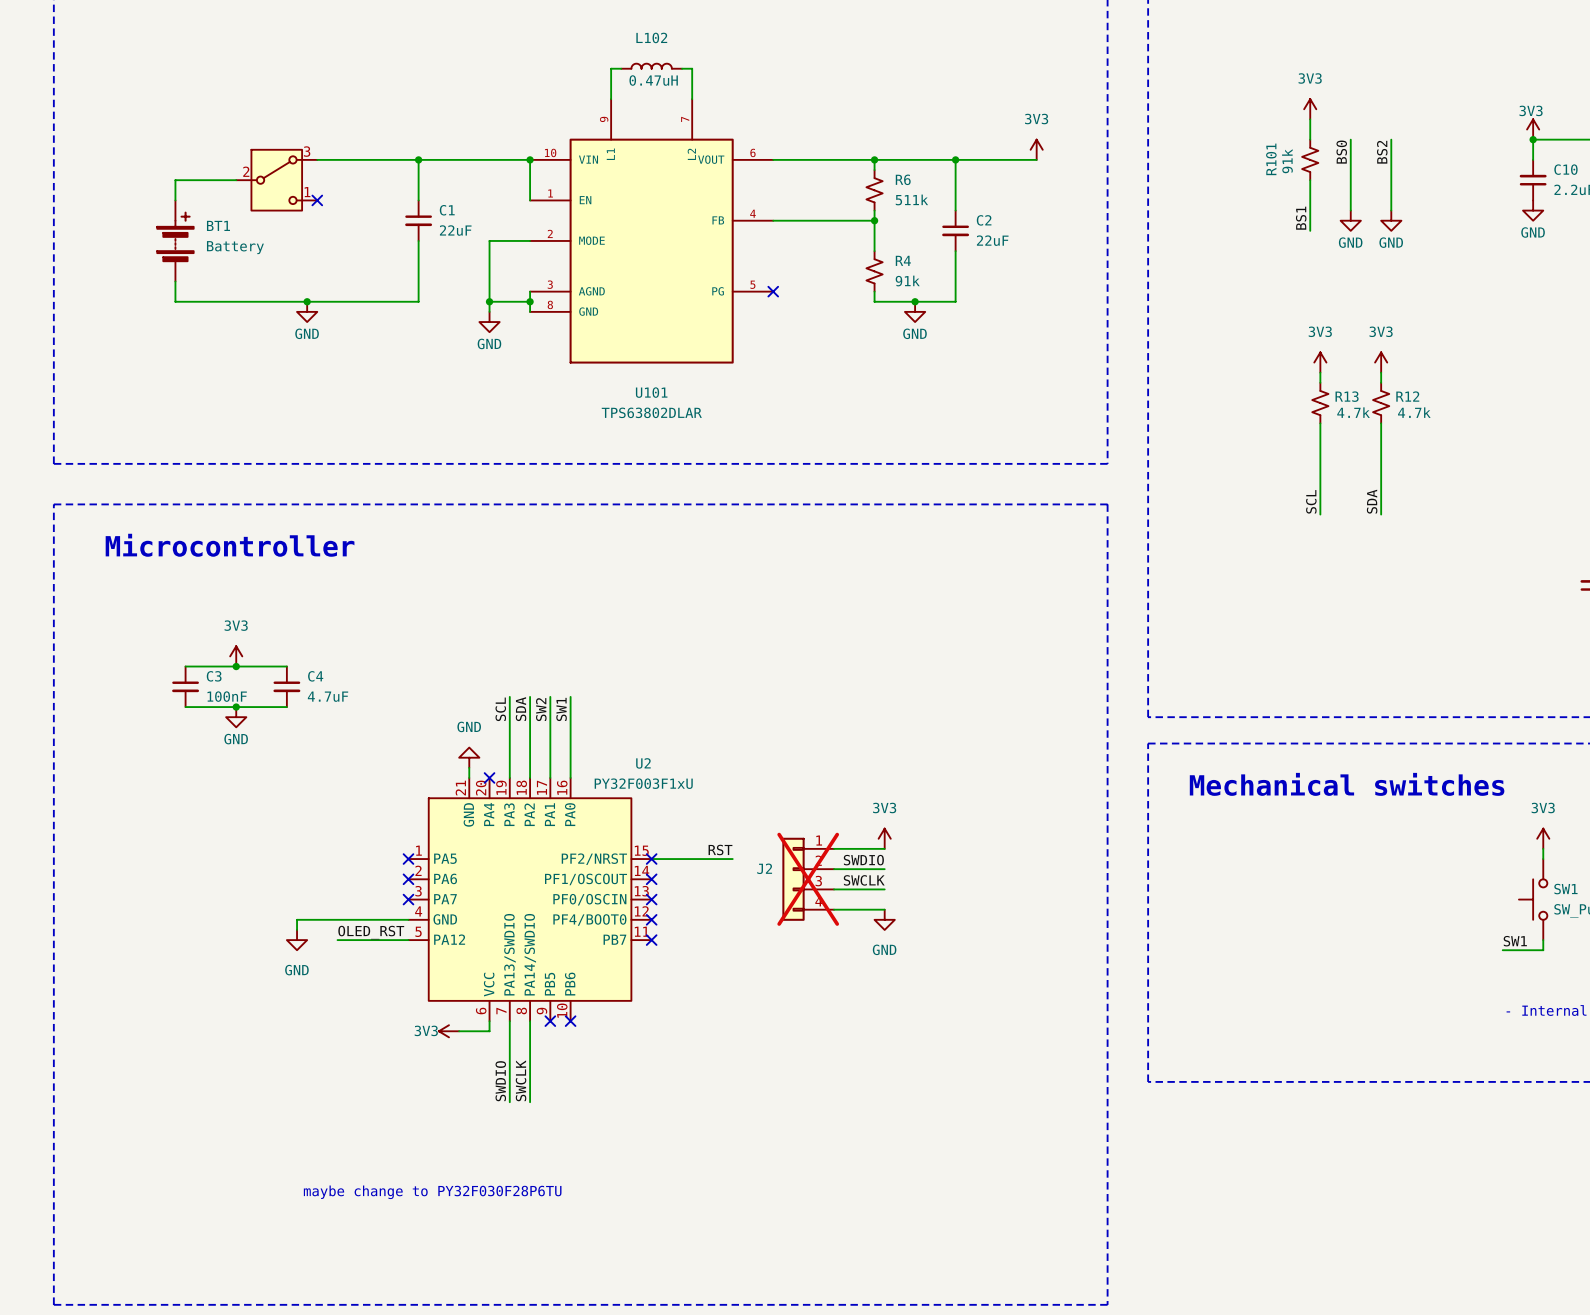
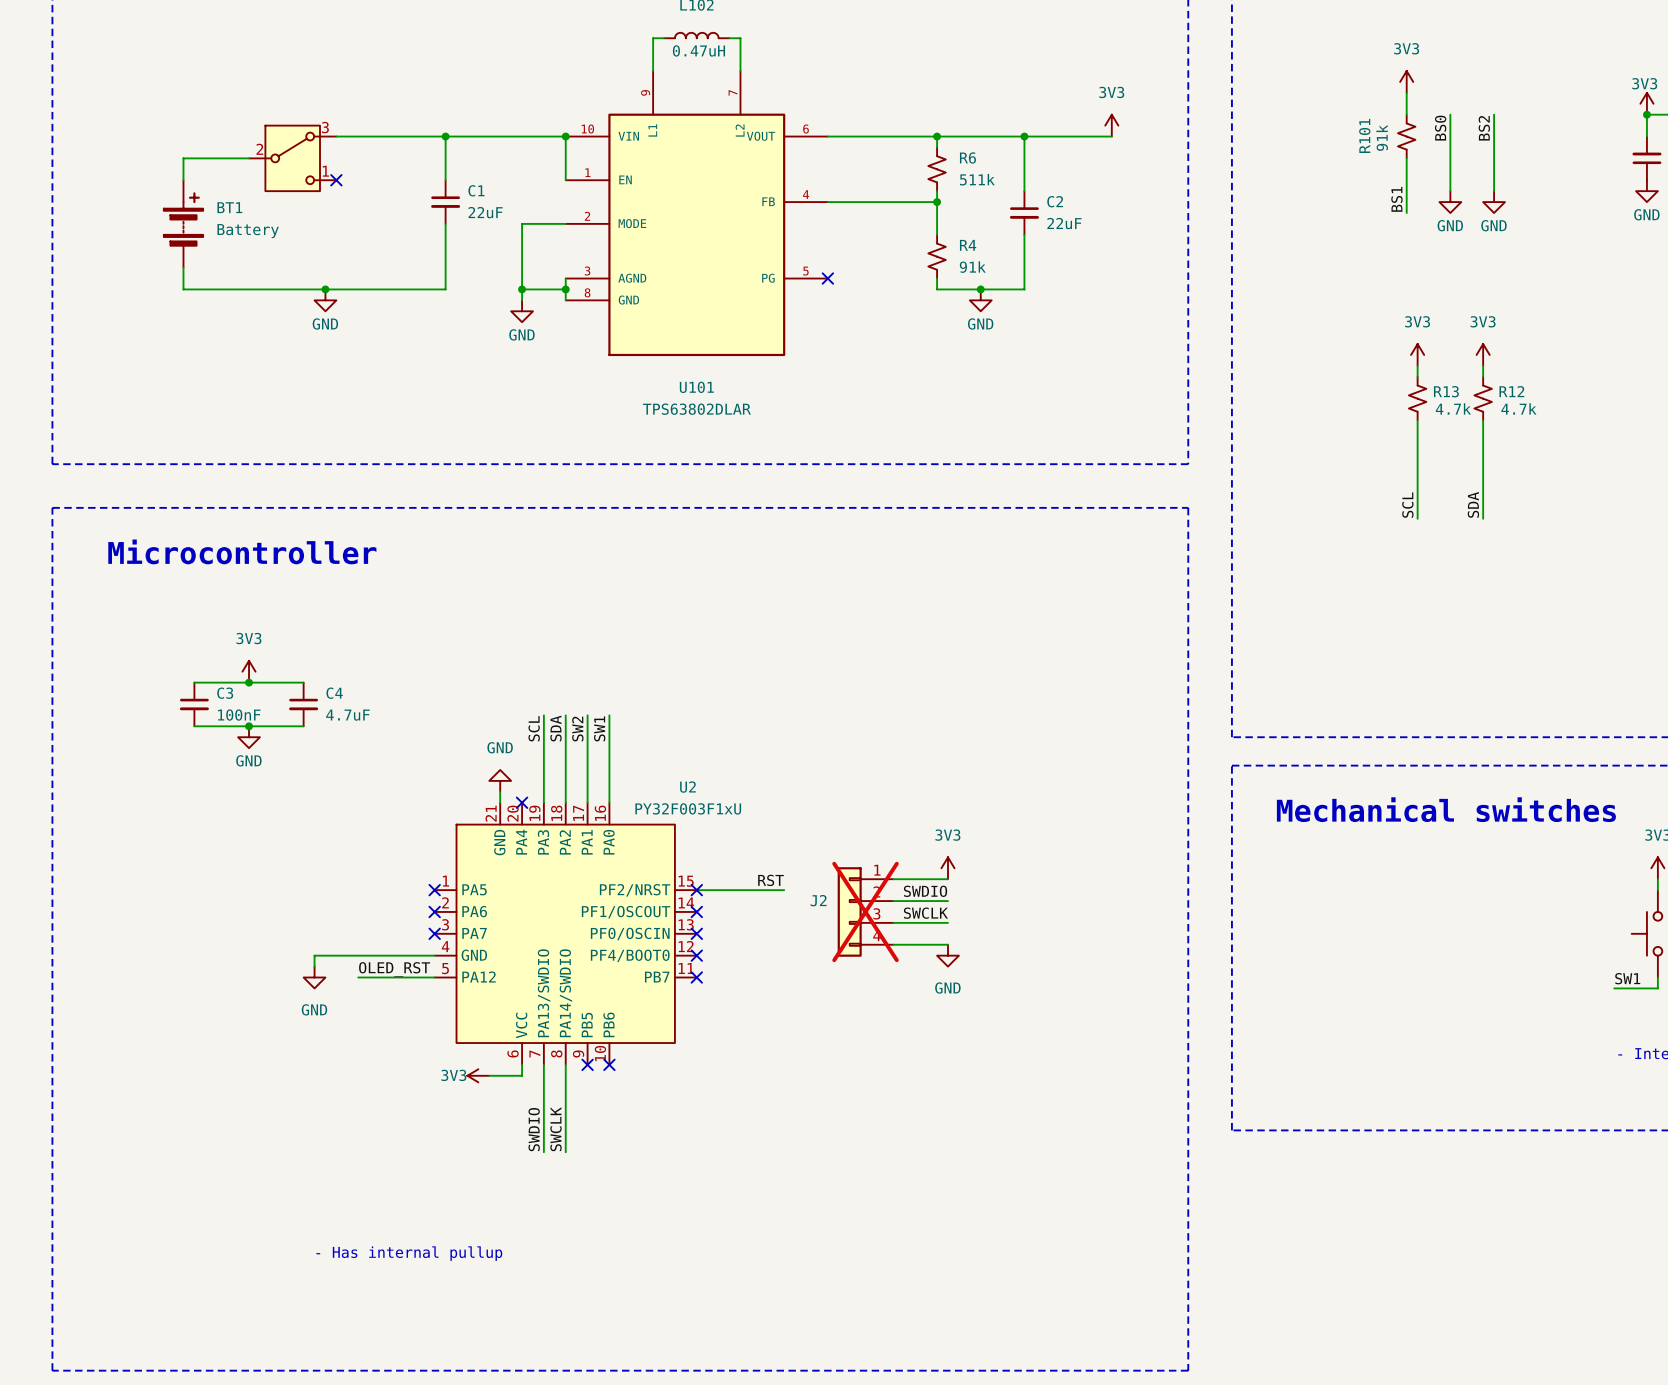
text: maybe change to PY32F030F28P6TU (432, 1192) -> none
text: none -> - Has internal pullup (409, 1253)

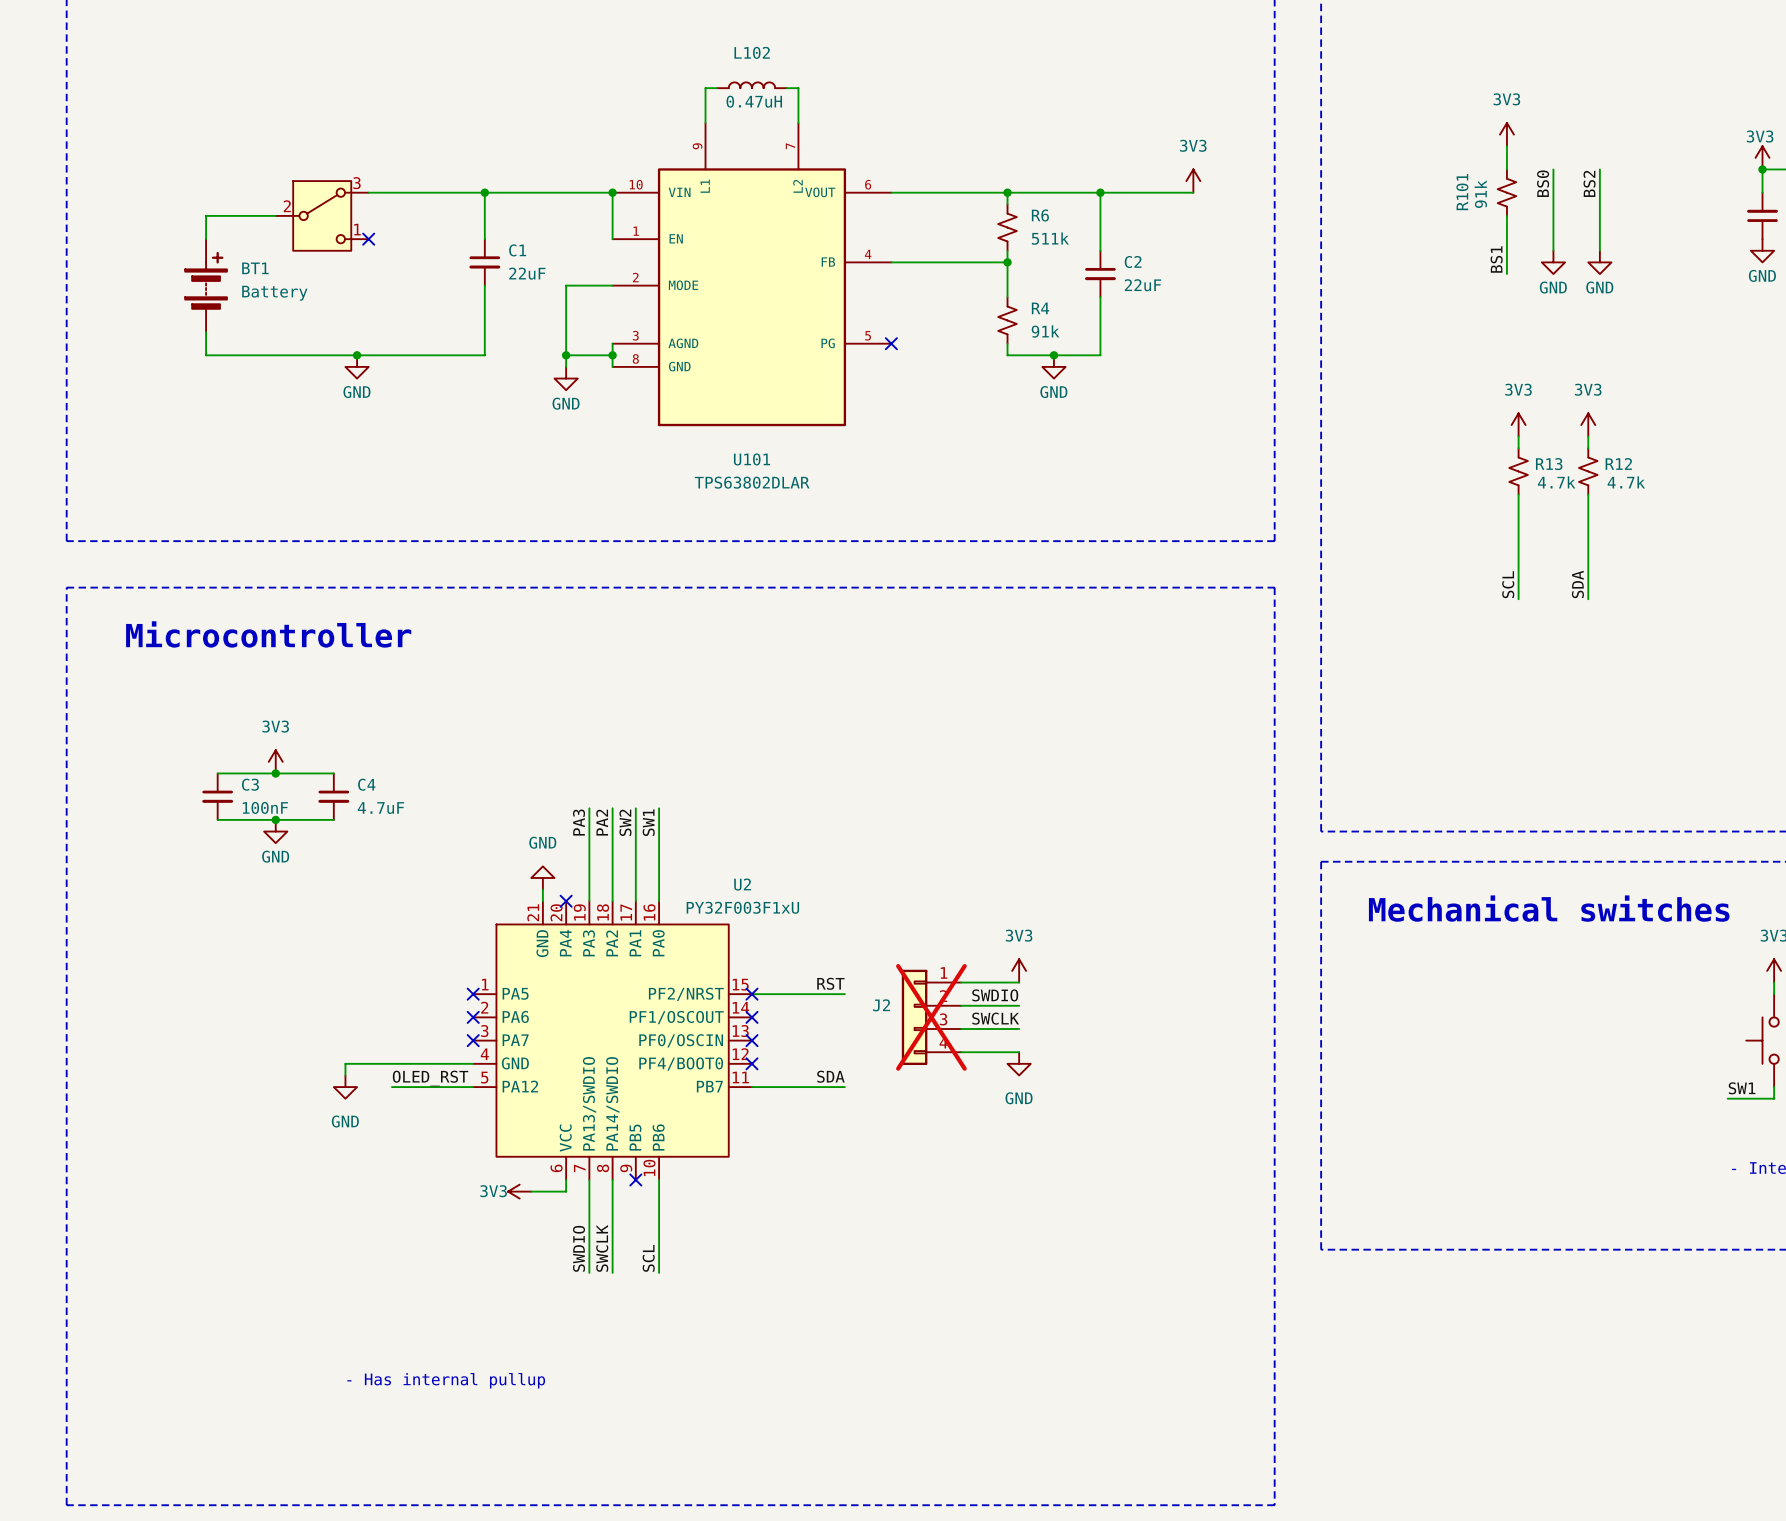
label: SCL (534, 728) -> PA3 (579, 822)
label: SDA (556, 728) -> PA2 (602, 822)
label: none -> SDA (830, 1076)
wire: none -> (751, 1087) (844, 1087)
no-connect mark: (696, 977) -> none
wire: none -> (659, 1179) (659, 1272)
no-connect mark: (609, 1064) -> none
label: none -> SCL (648, 1258)

